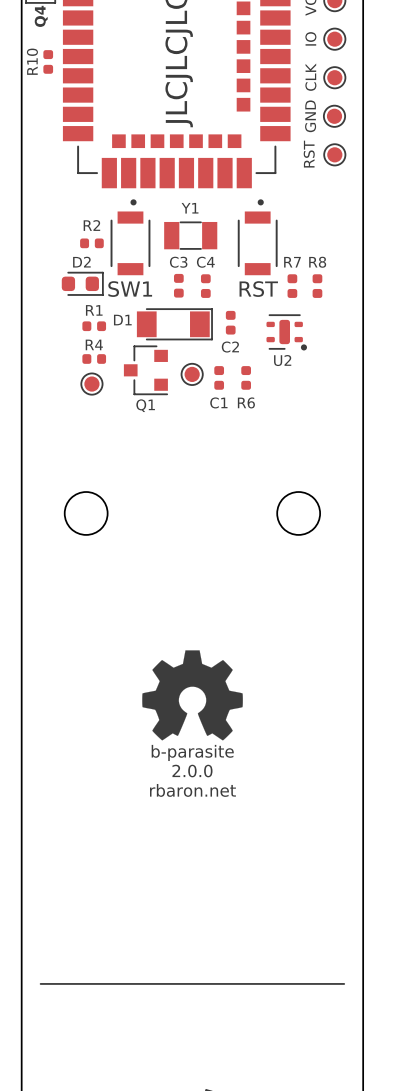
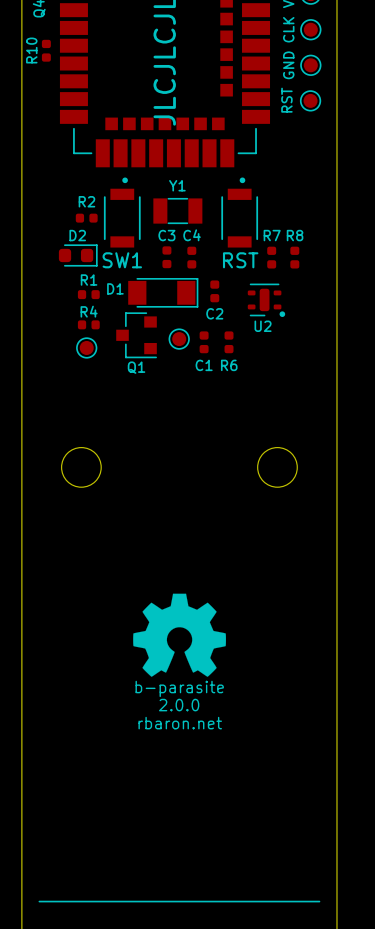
part value: IO (310, 38) -> CLK (288, 29)
part value: CLK (310, 77) -> GND (288, 65)
part value: GND (310, 116) -> RST (286, 100)
part: RST (334, 154) -> none

